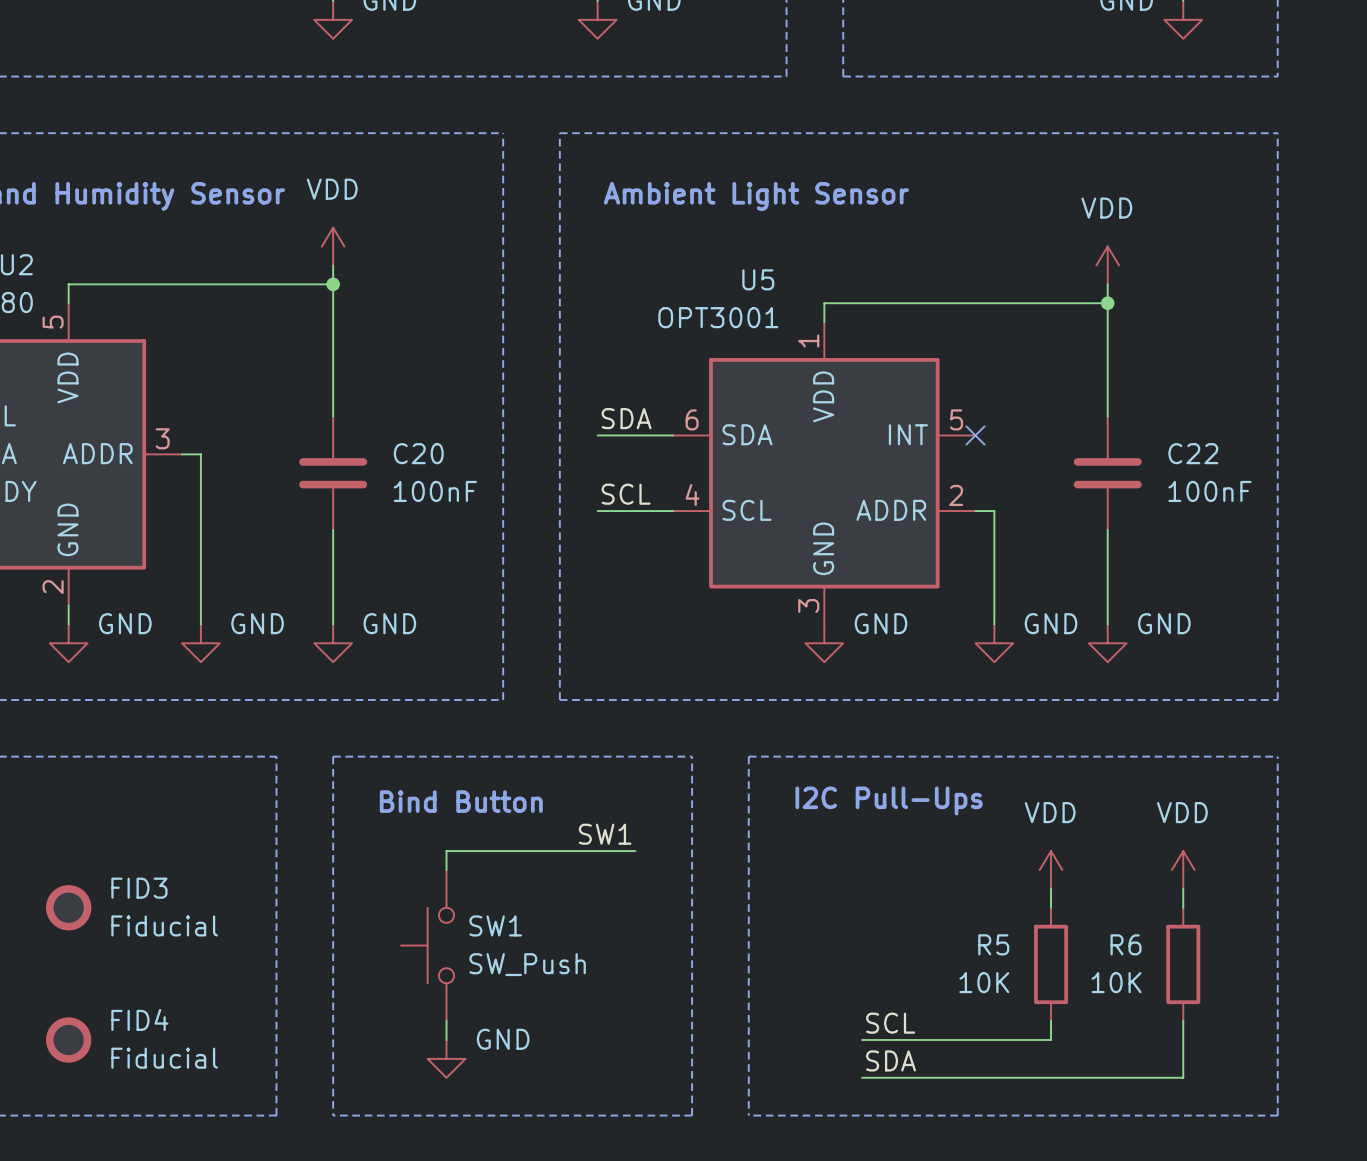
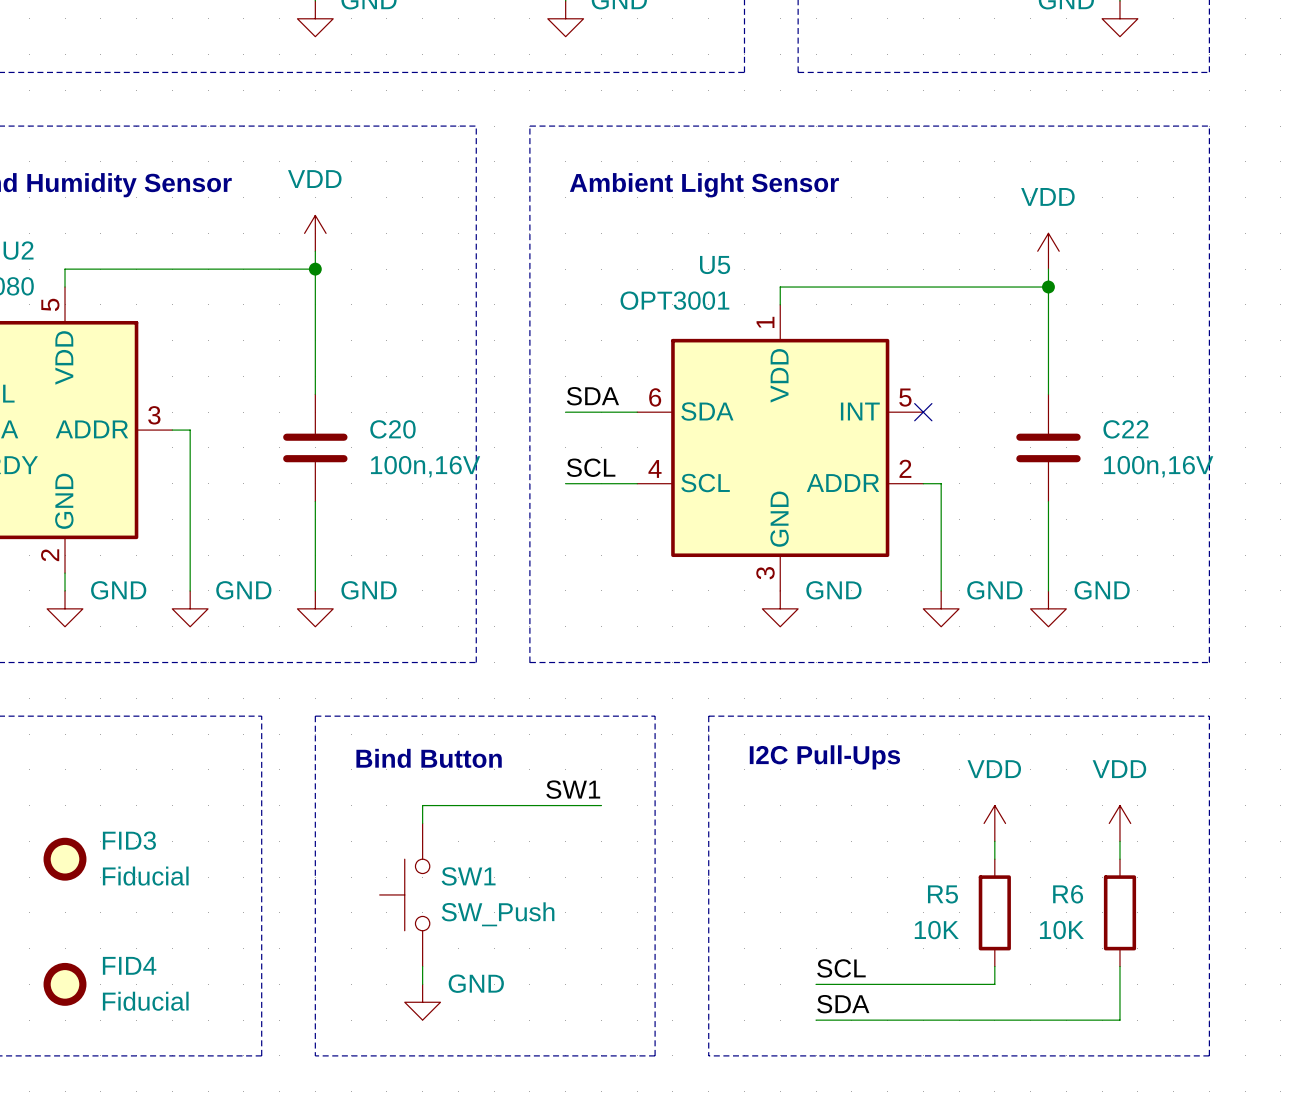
C20 value: 100nF (435, 491) -> 100n,16V (425, 466)
C22 value: 100nF (1209, 491) -> 100n,16V (1158, 466)

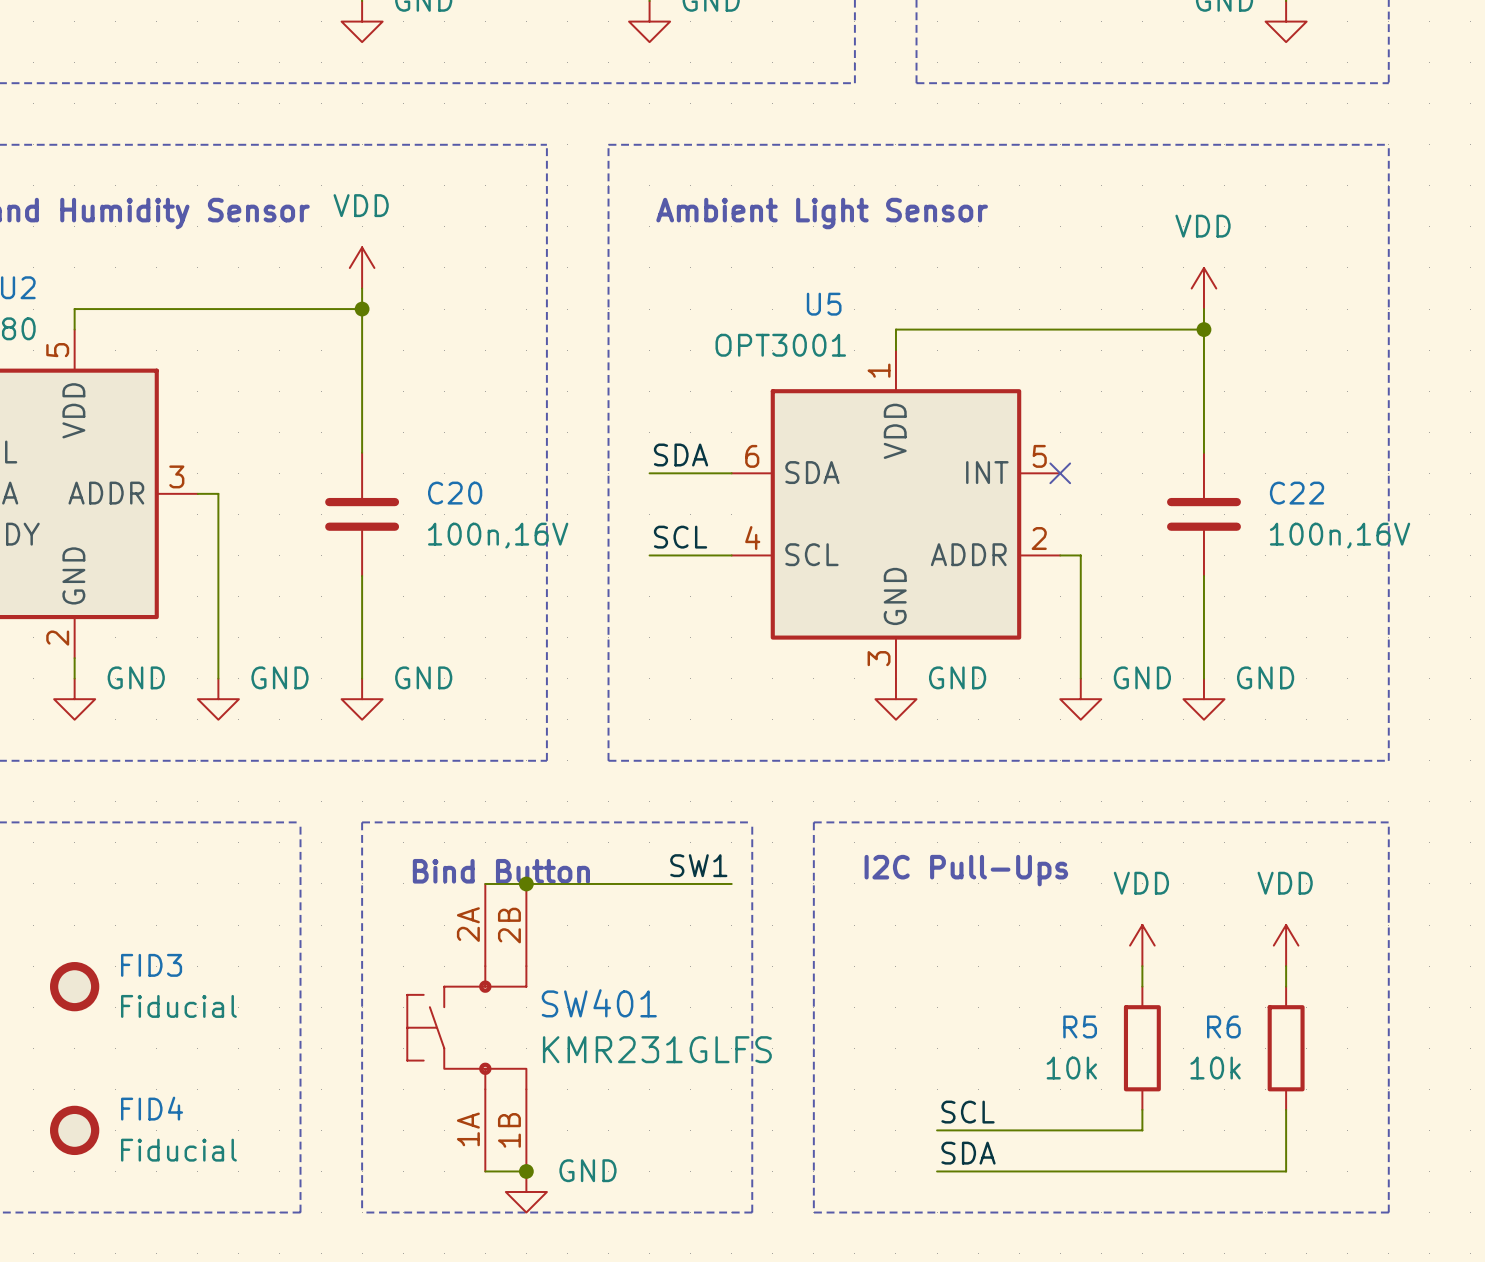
wire: none -> (485, 883) (731, 883)
junction: none -> (526, 883)
label position: SW1 (573, 789) -> SW1 (698, 865)
wire: (601, 805) (422, 805) (422, 823) -> none
SW1: SW_Push (404, 894) -> none
SW401: none -> KMR231GLFS (466, 1027)
R5 value: 10K (936, 930) -> 10k (1071, 1068)
R6 value: 10K (1061, 930) -> 10k (1215, 1068)
power symbol position: GND (422, 1002) -> GND (526, 1191)
wire: none -> (485, 1171) (526, 1171)
junction: none -> (526, 1171)

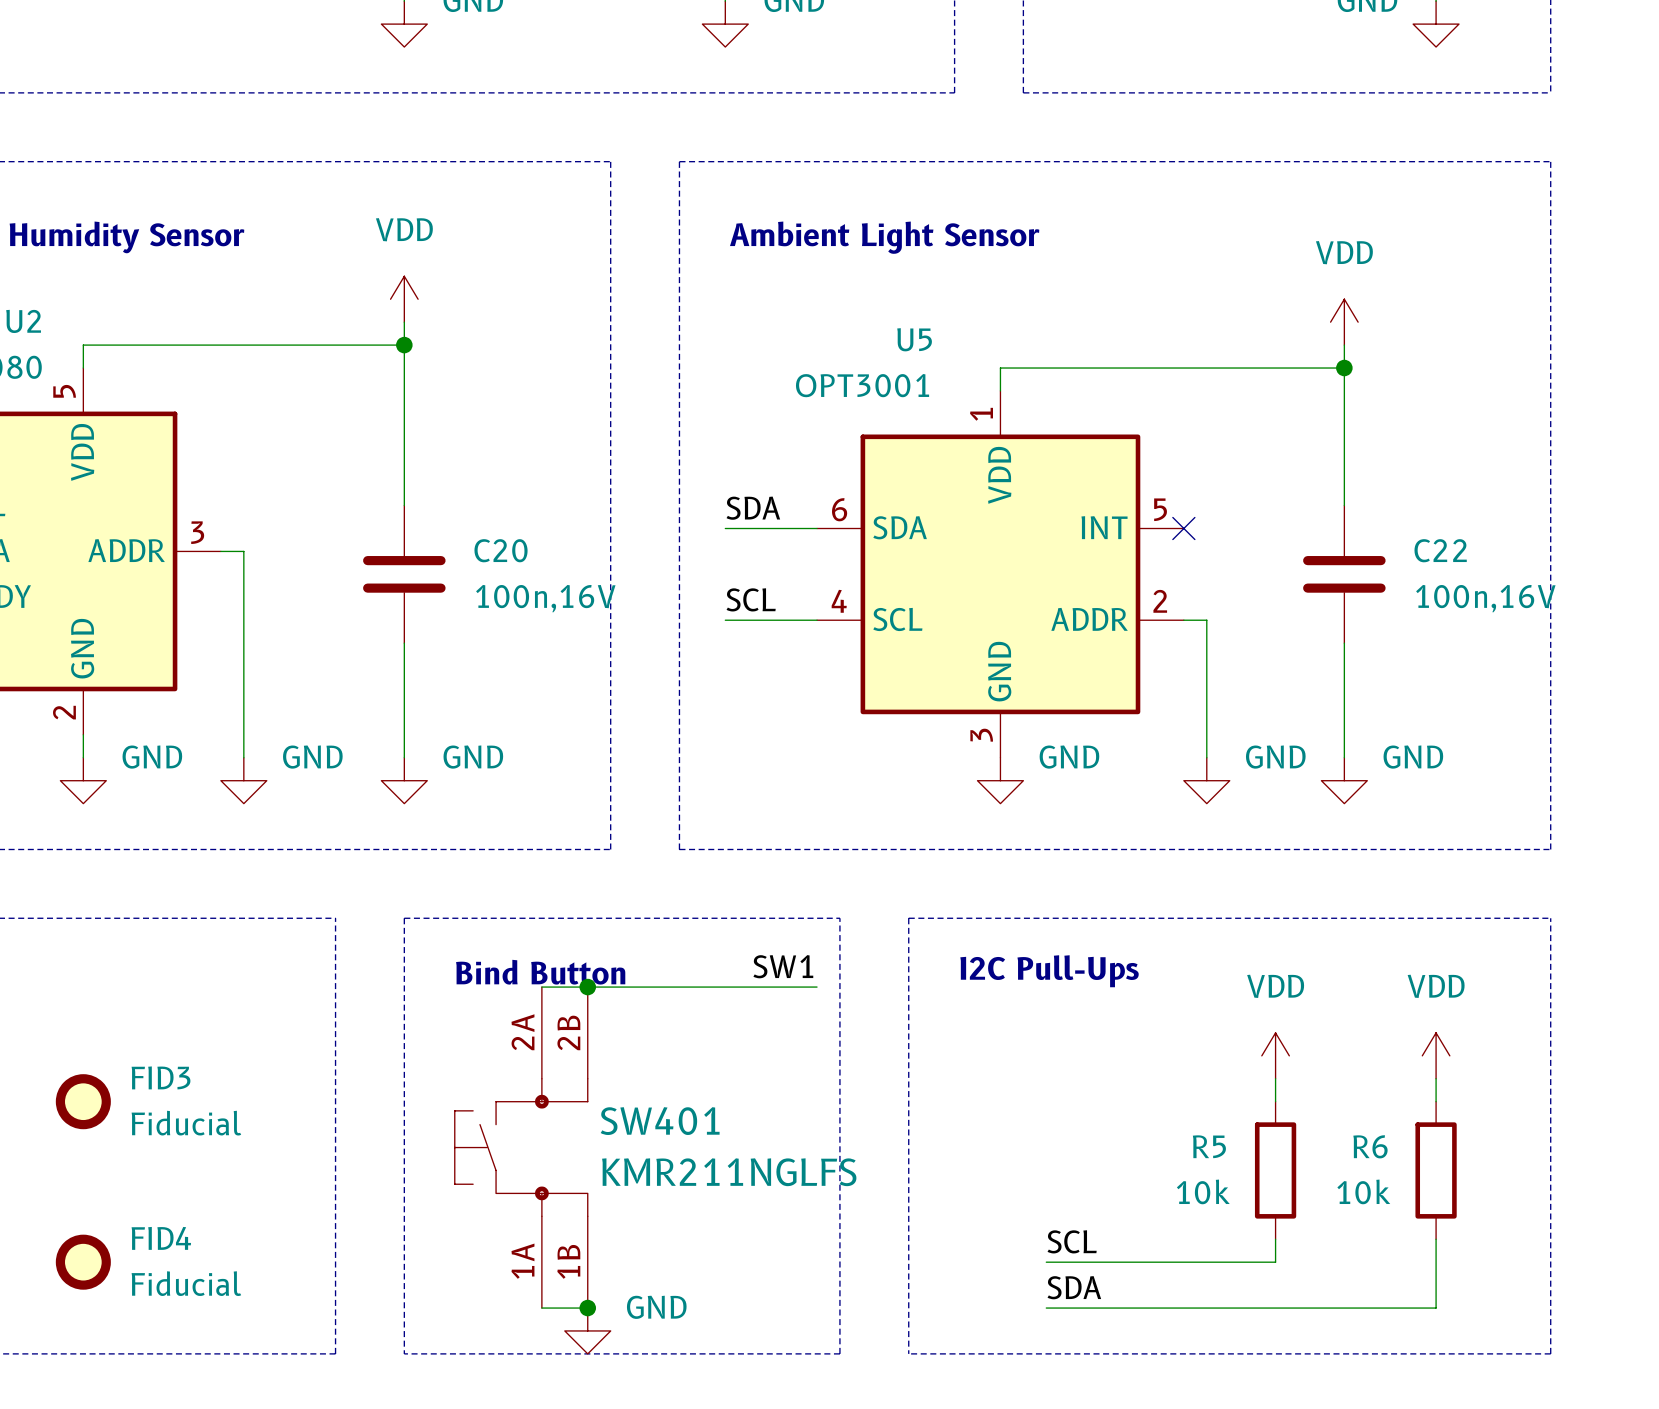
SW401 value: KMR231GLFS (657, 1049) -> KMR211NGLFS (729, 1172)

